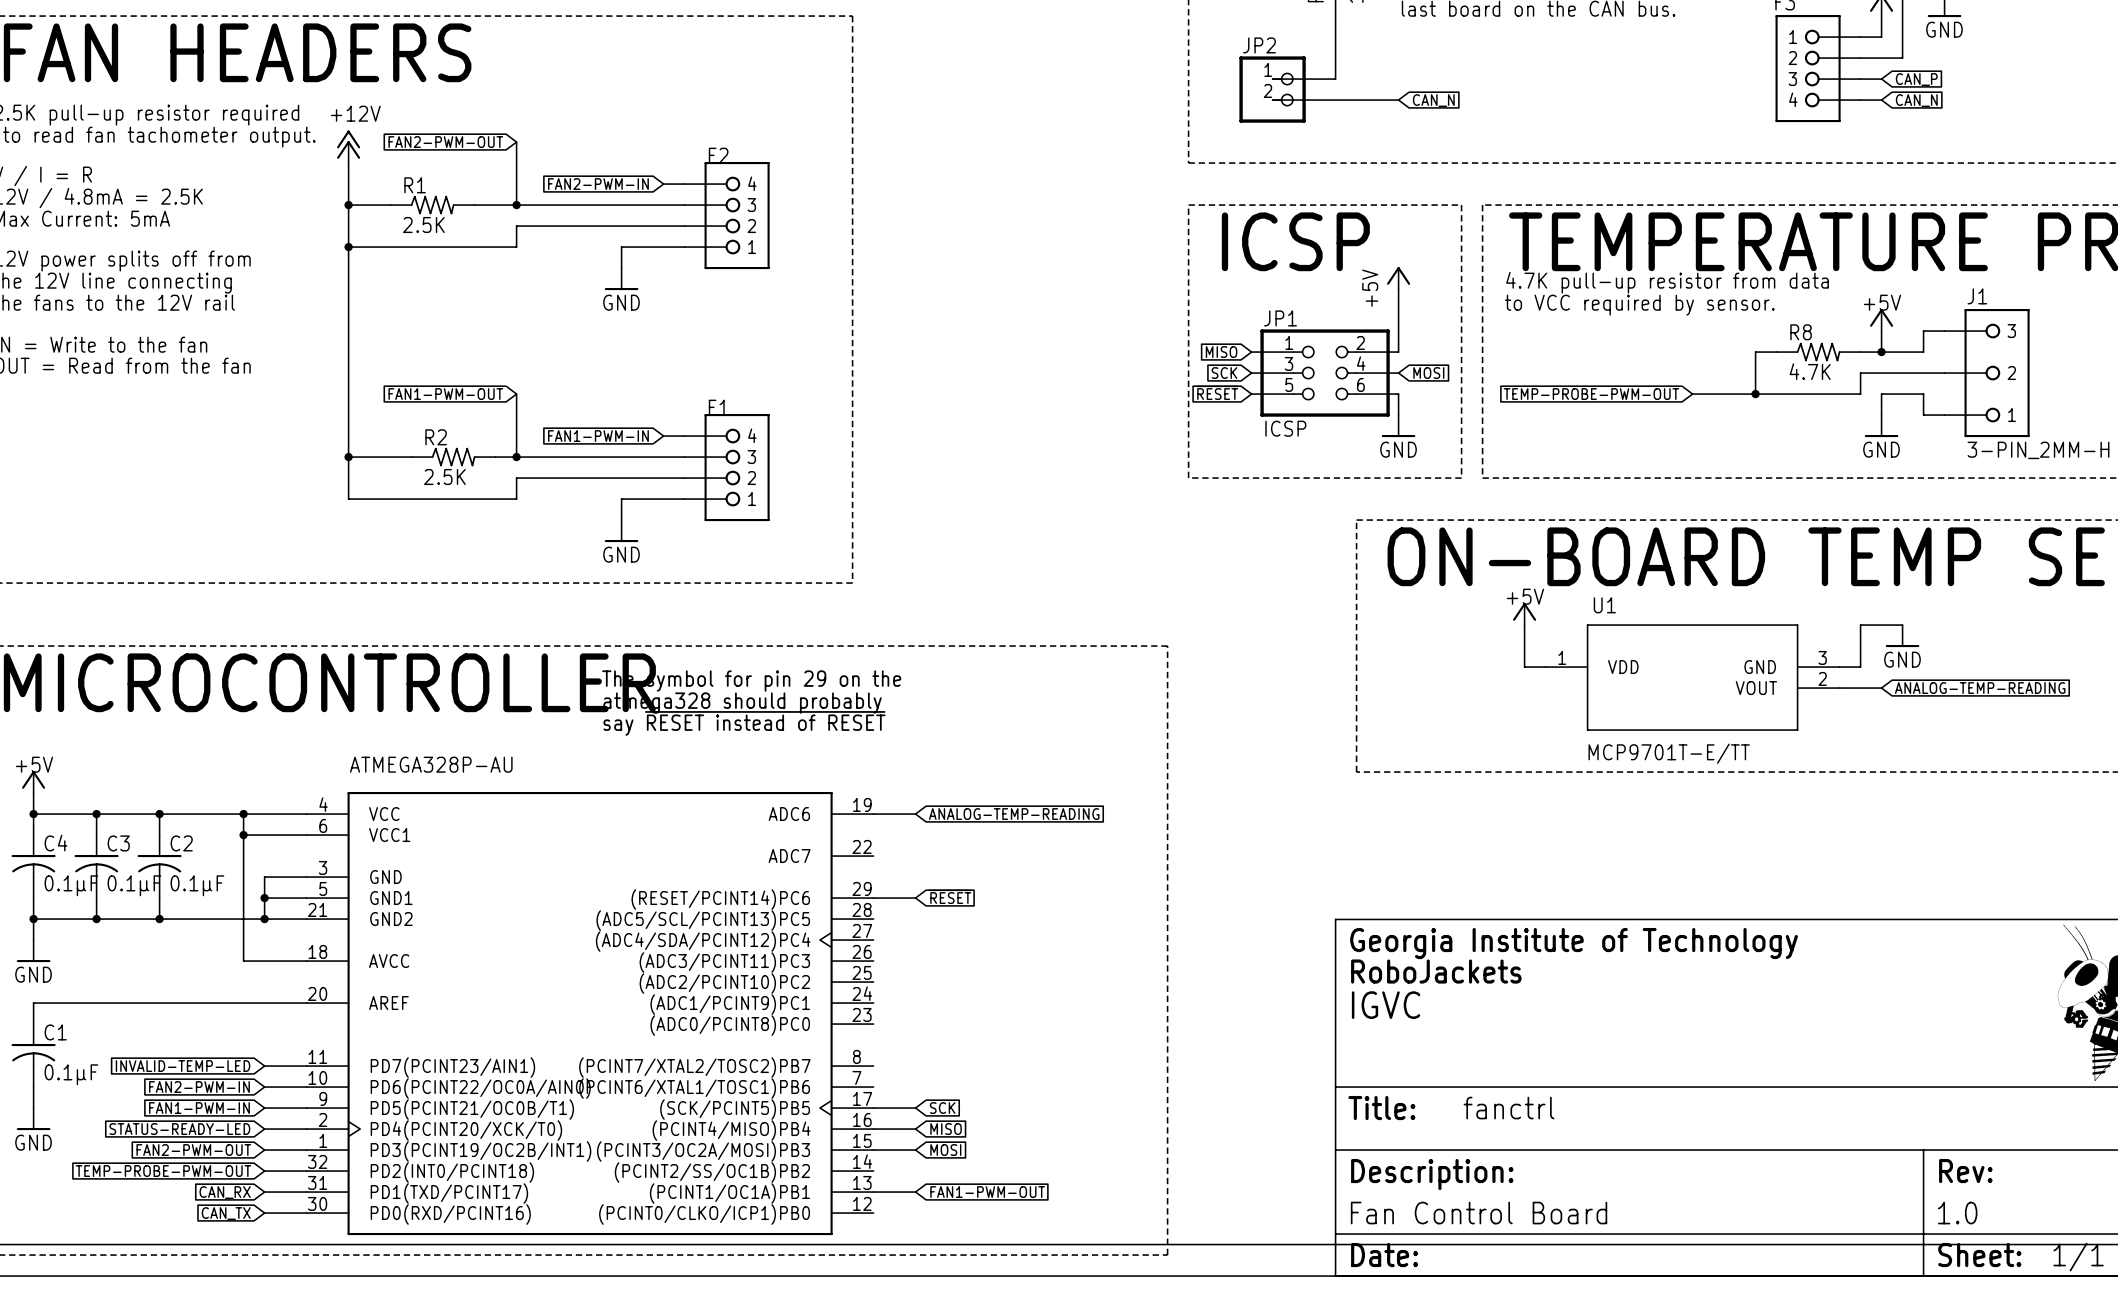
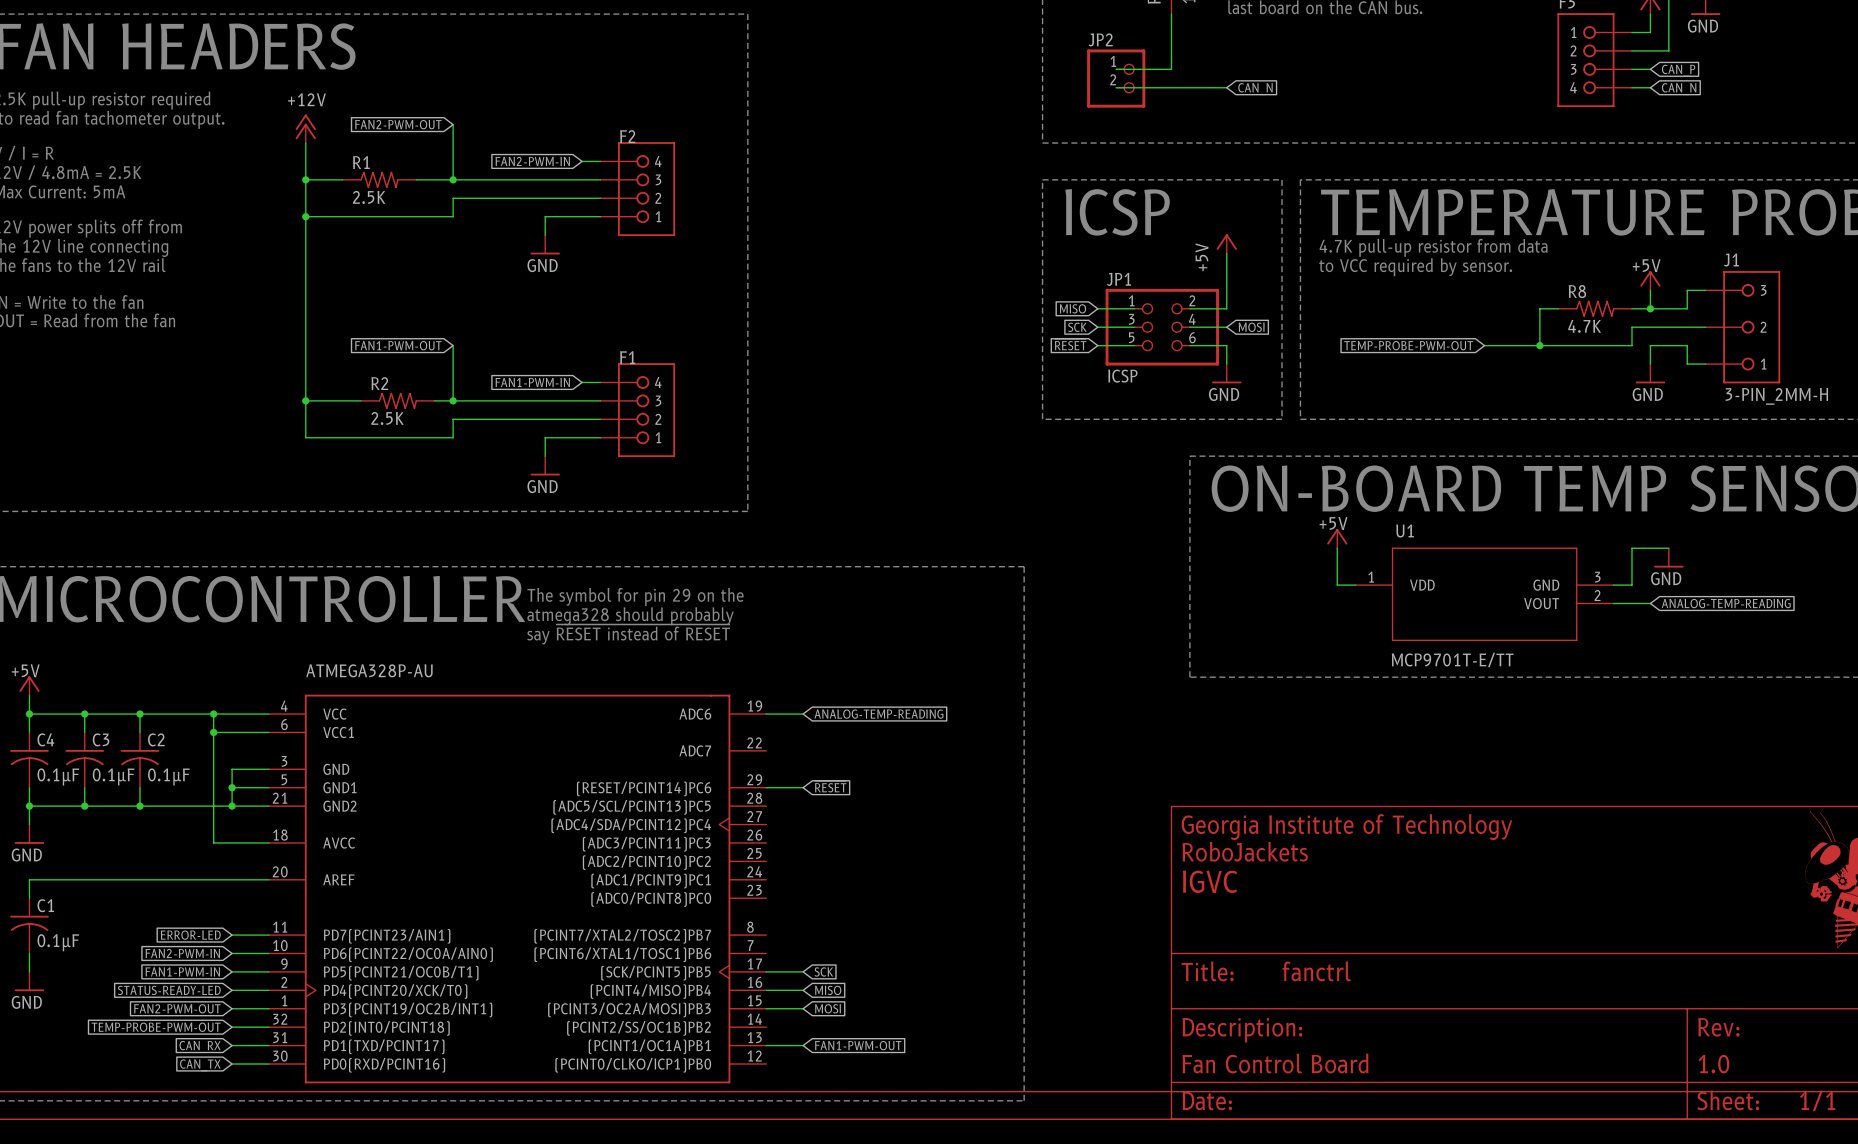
global label: INVALID-TEMP-LED (183, 1066) -> ERROR-LED (190, 935)

